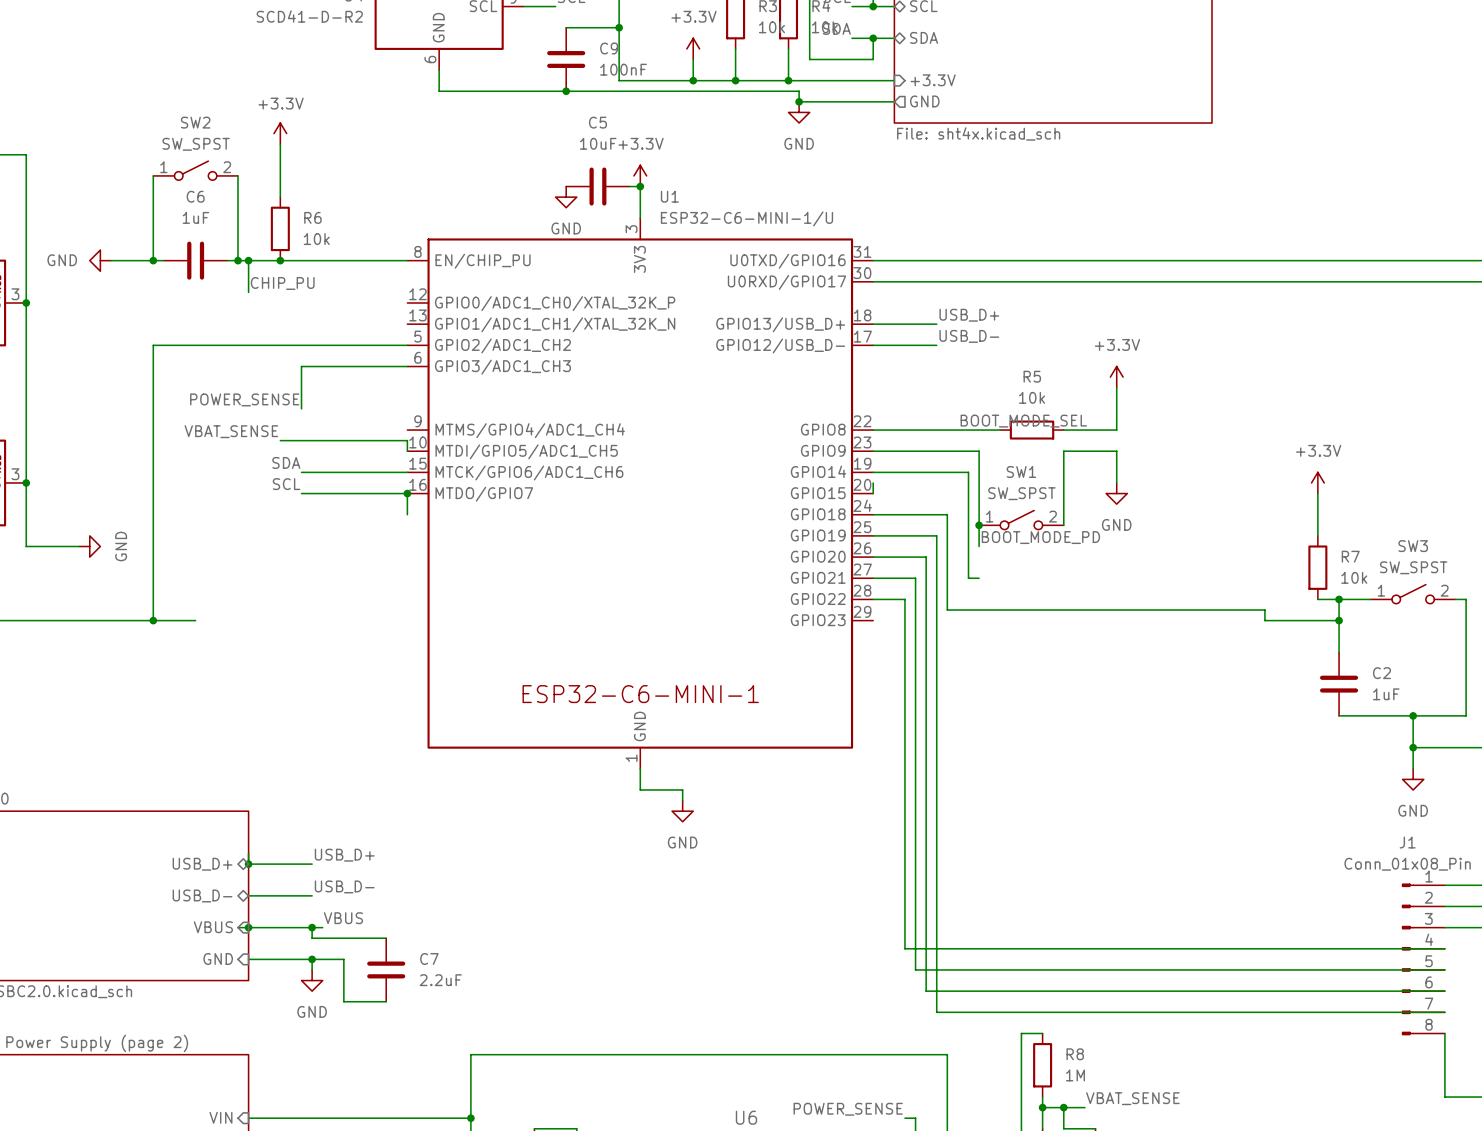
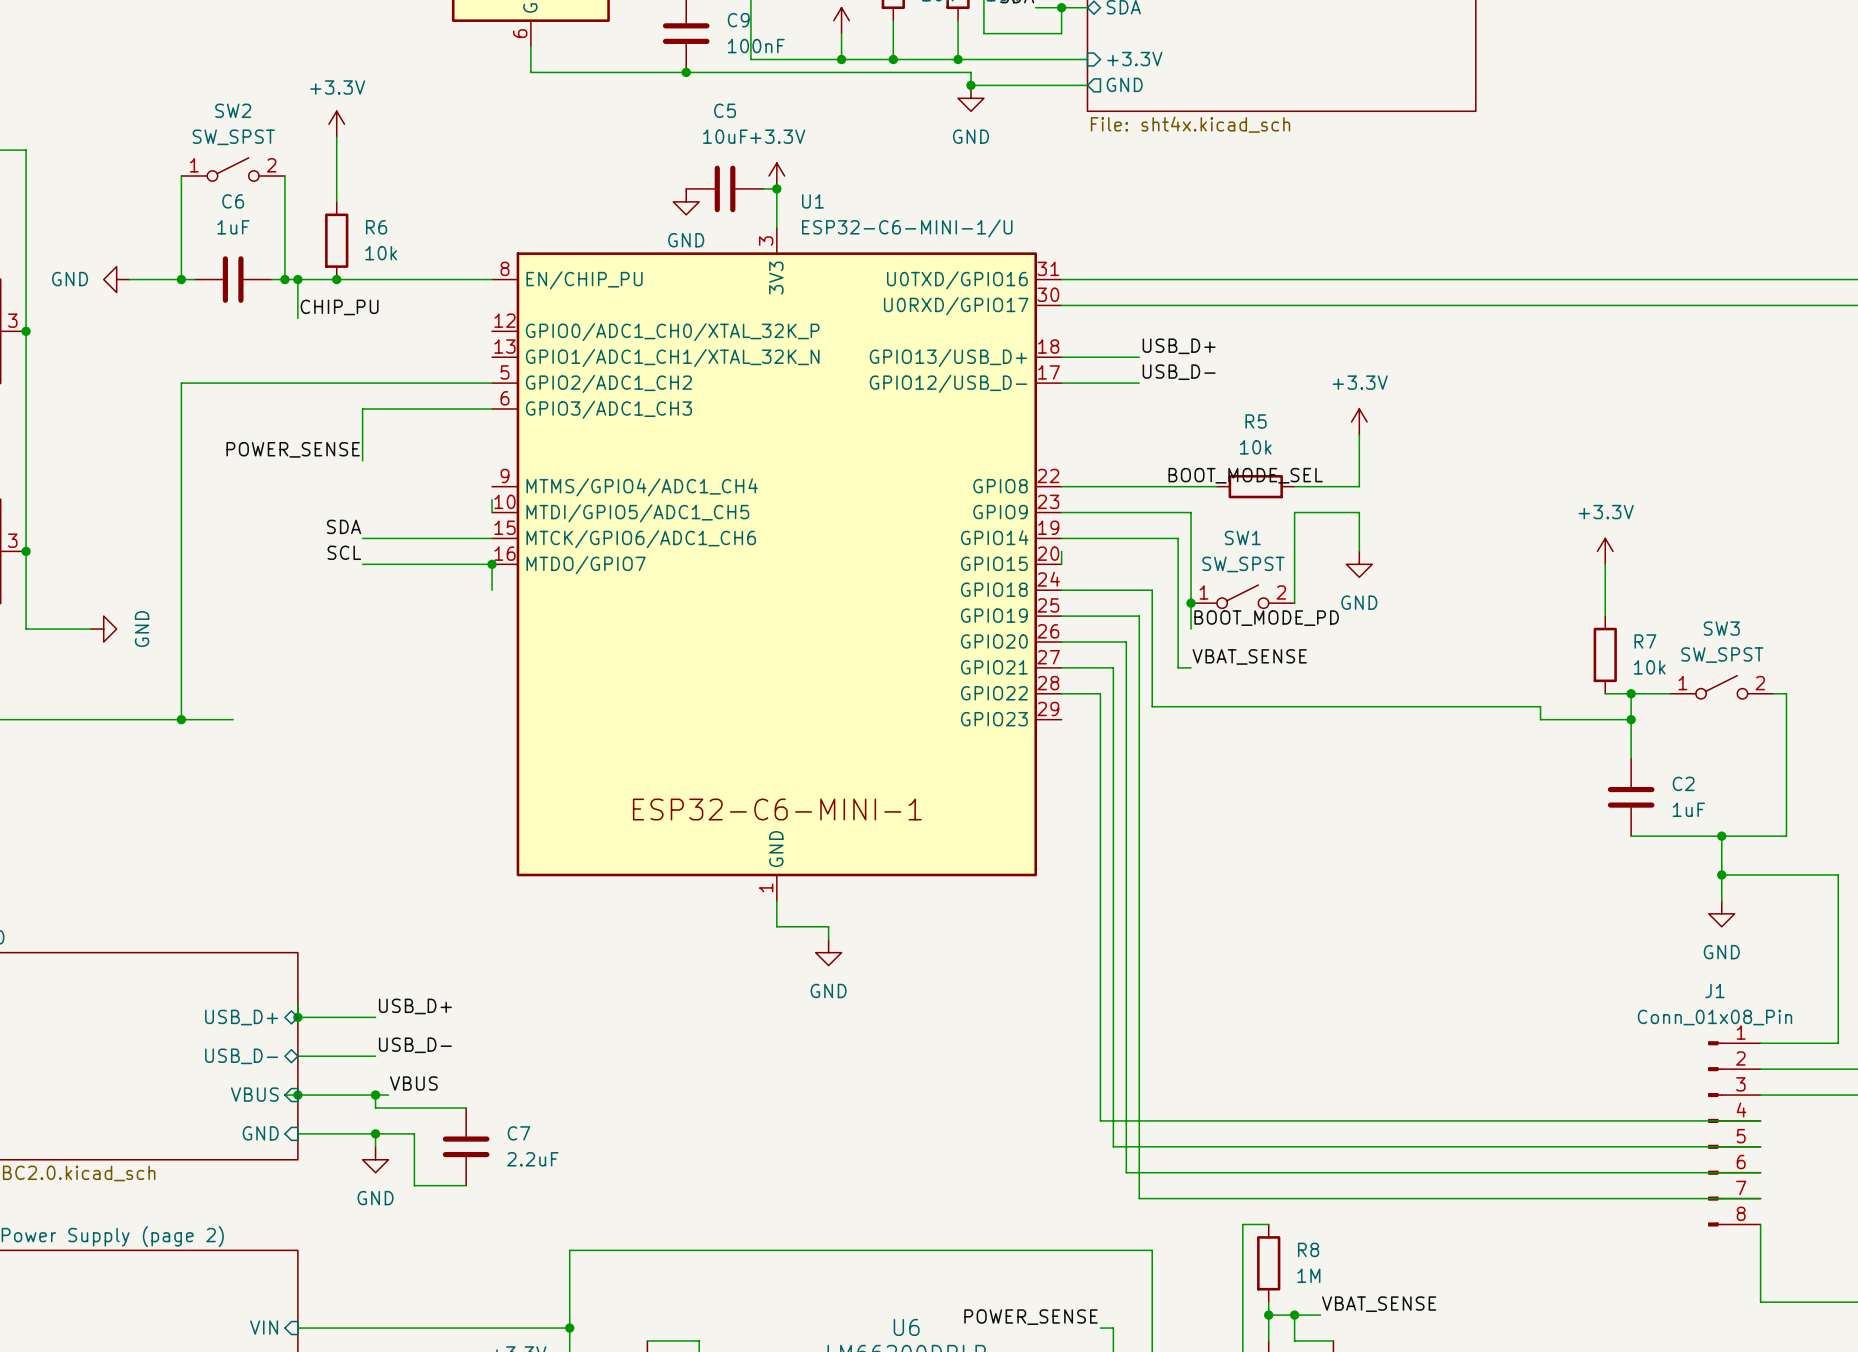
label: VBAT_SENSE (231, 431) -> none
wire: (280, 440) (407, 440) -> none
label: none -> VBAT_SENSE (1249, 656)

